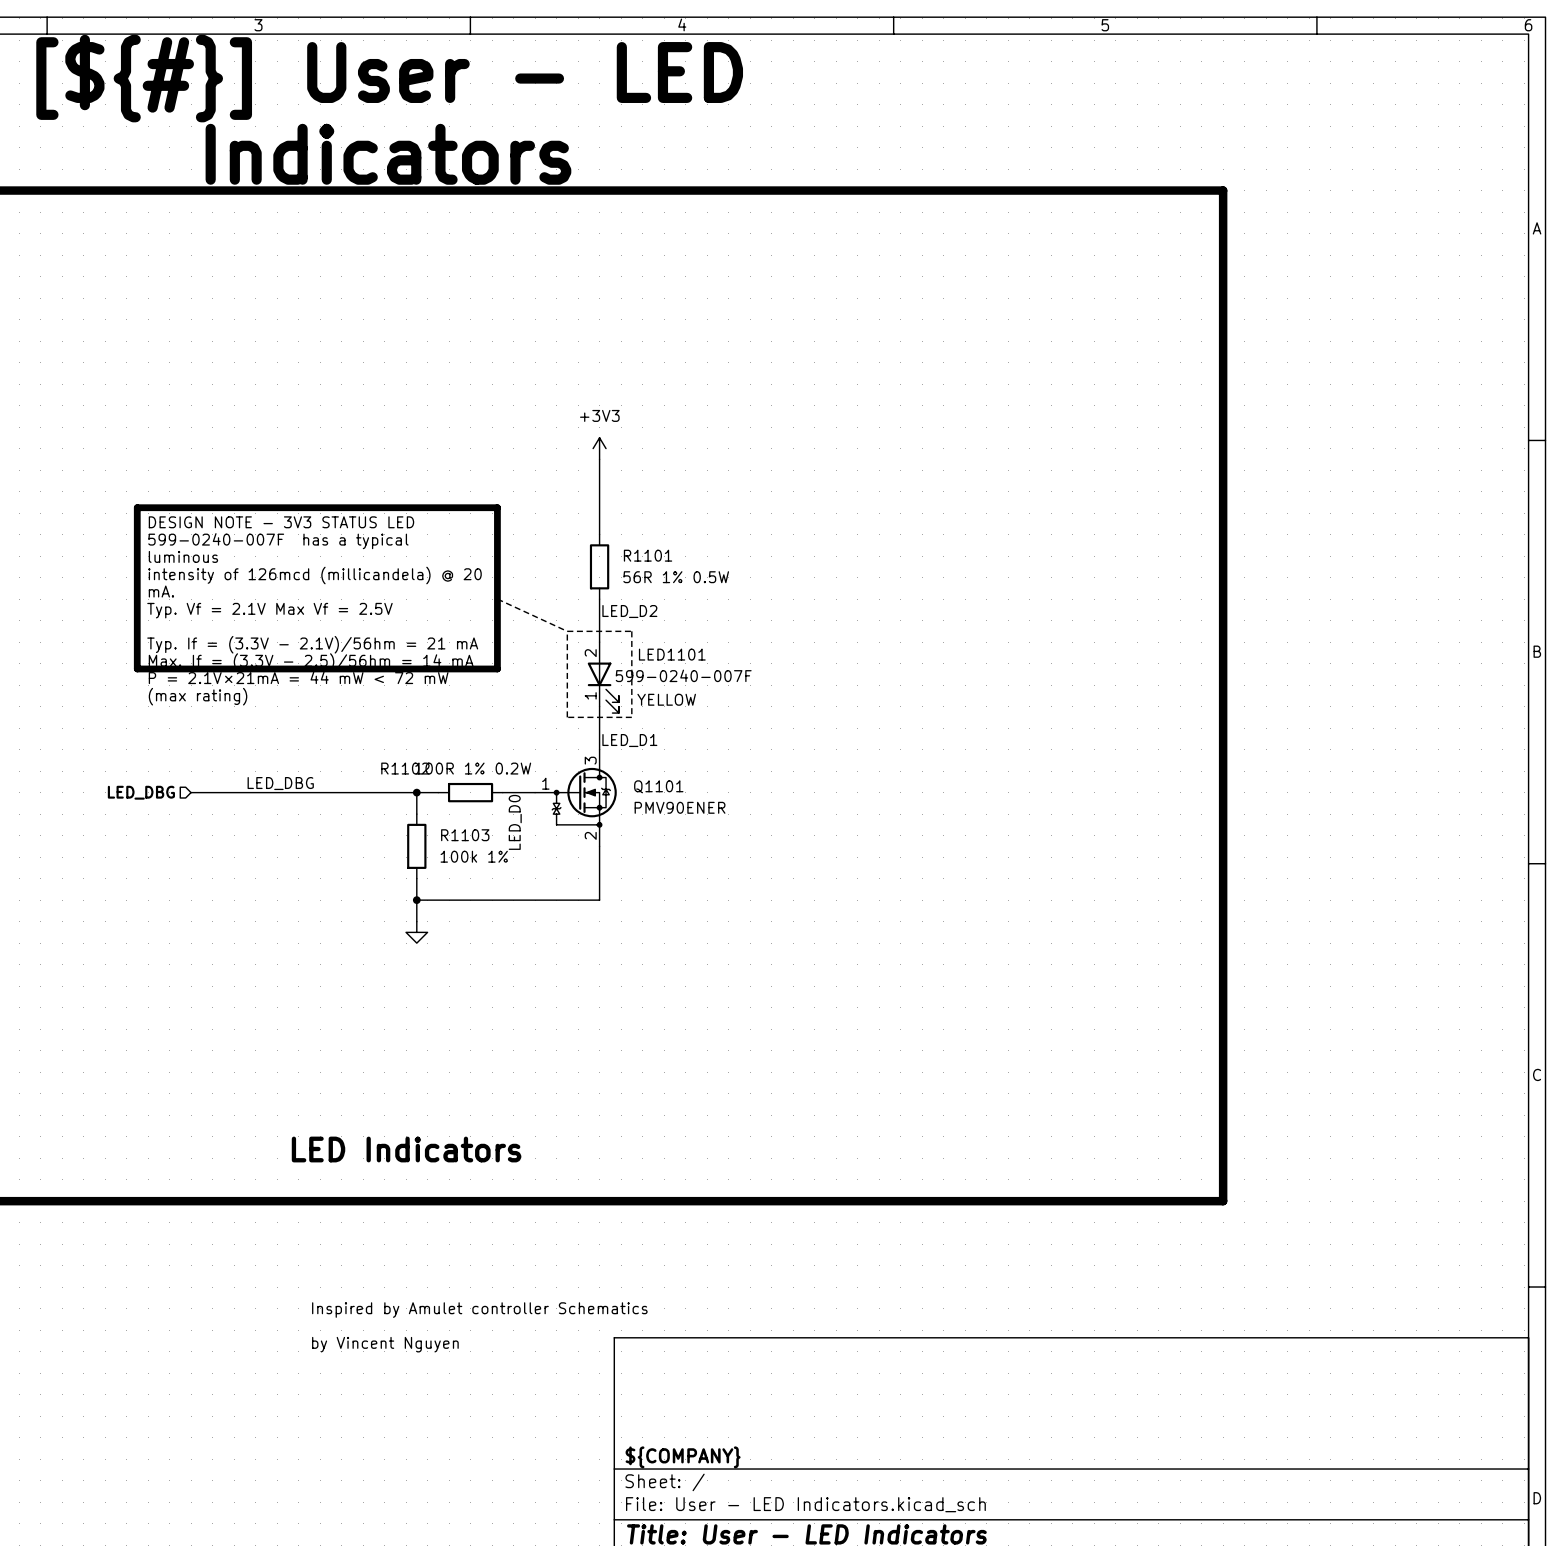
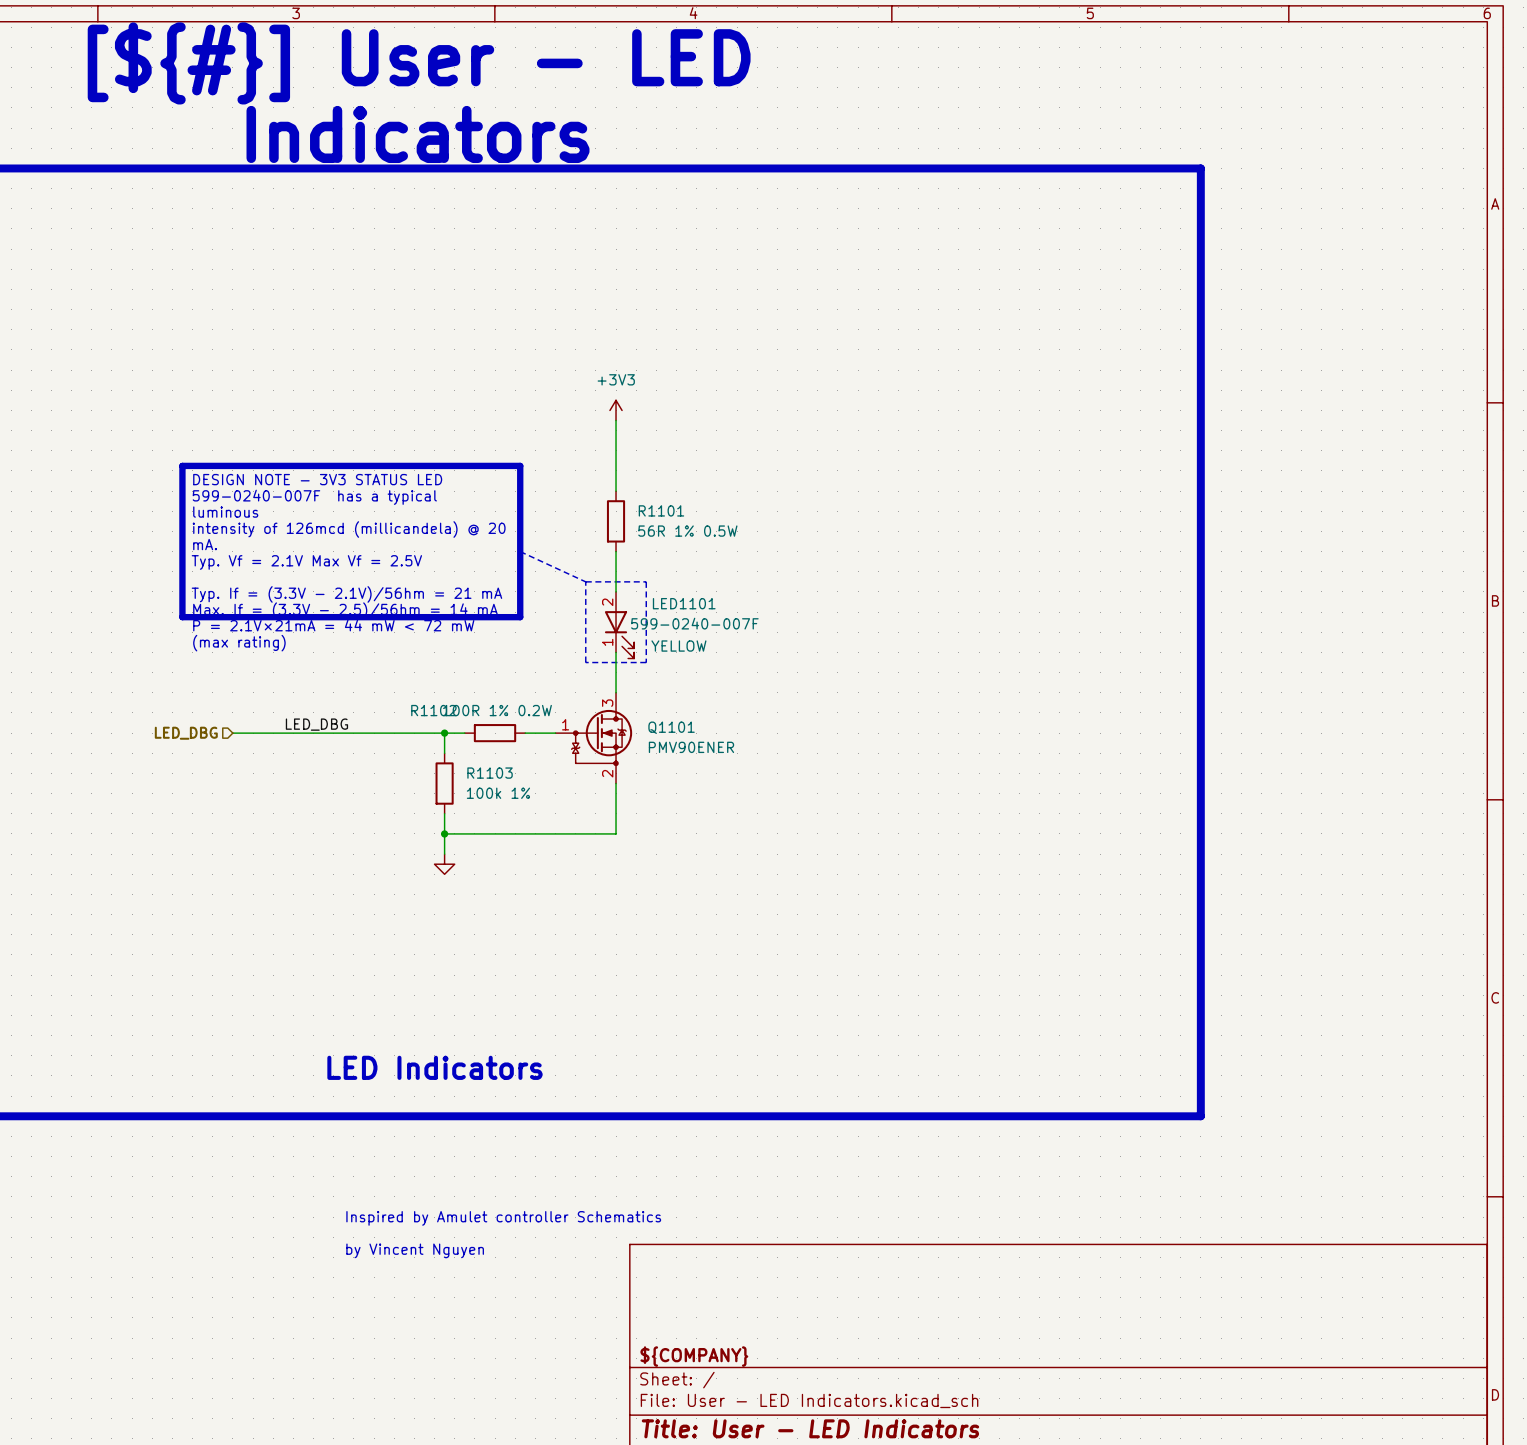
label: LED_D2 (629, 611) -> none
label: LED_D1 (629, 740) -> none
label: LED_D0 (515, 822) -> none

